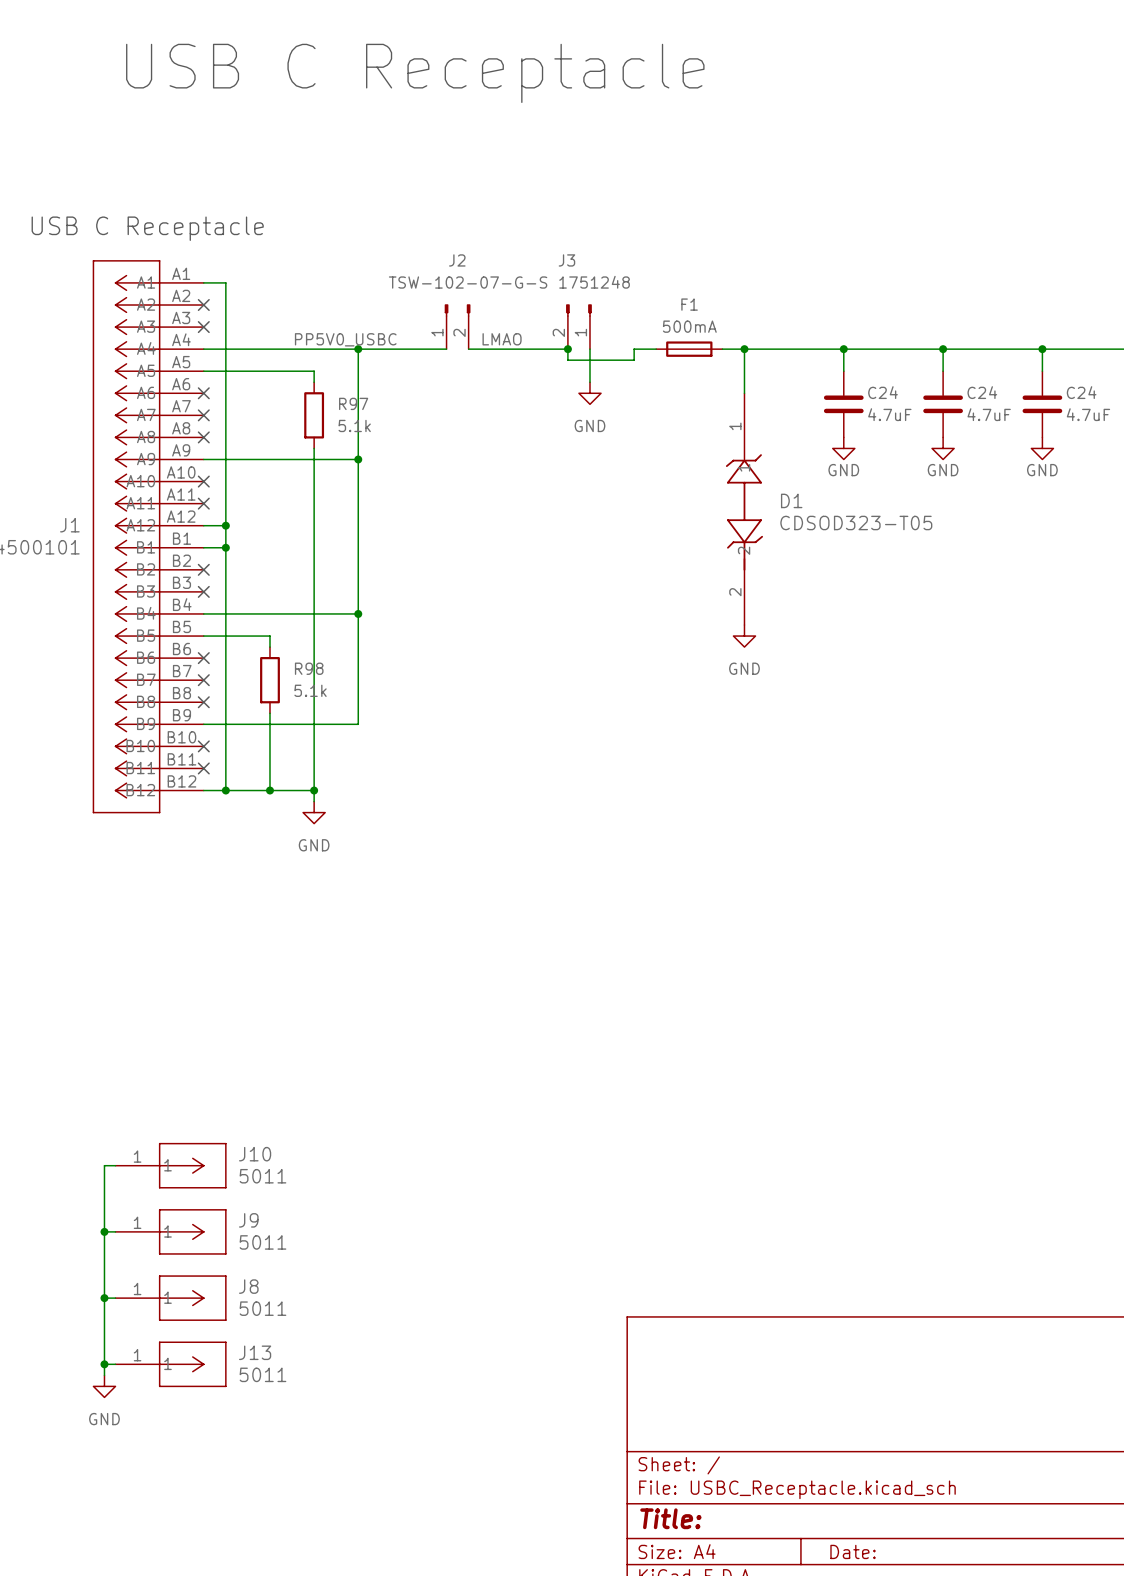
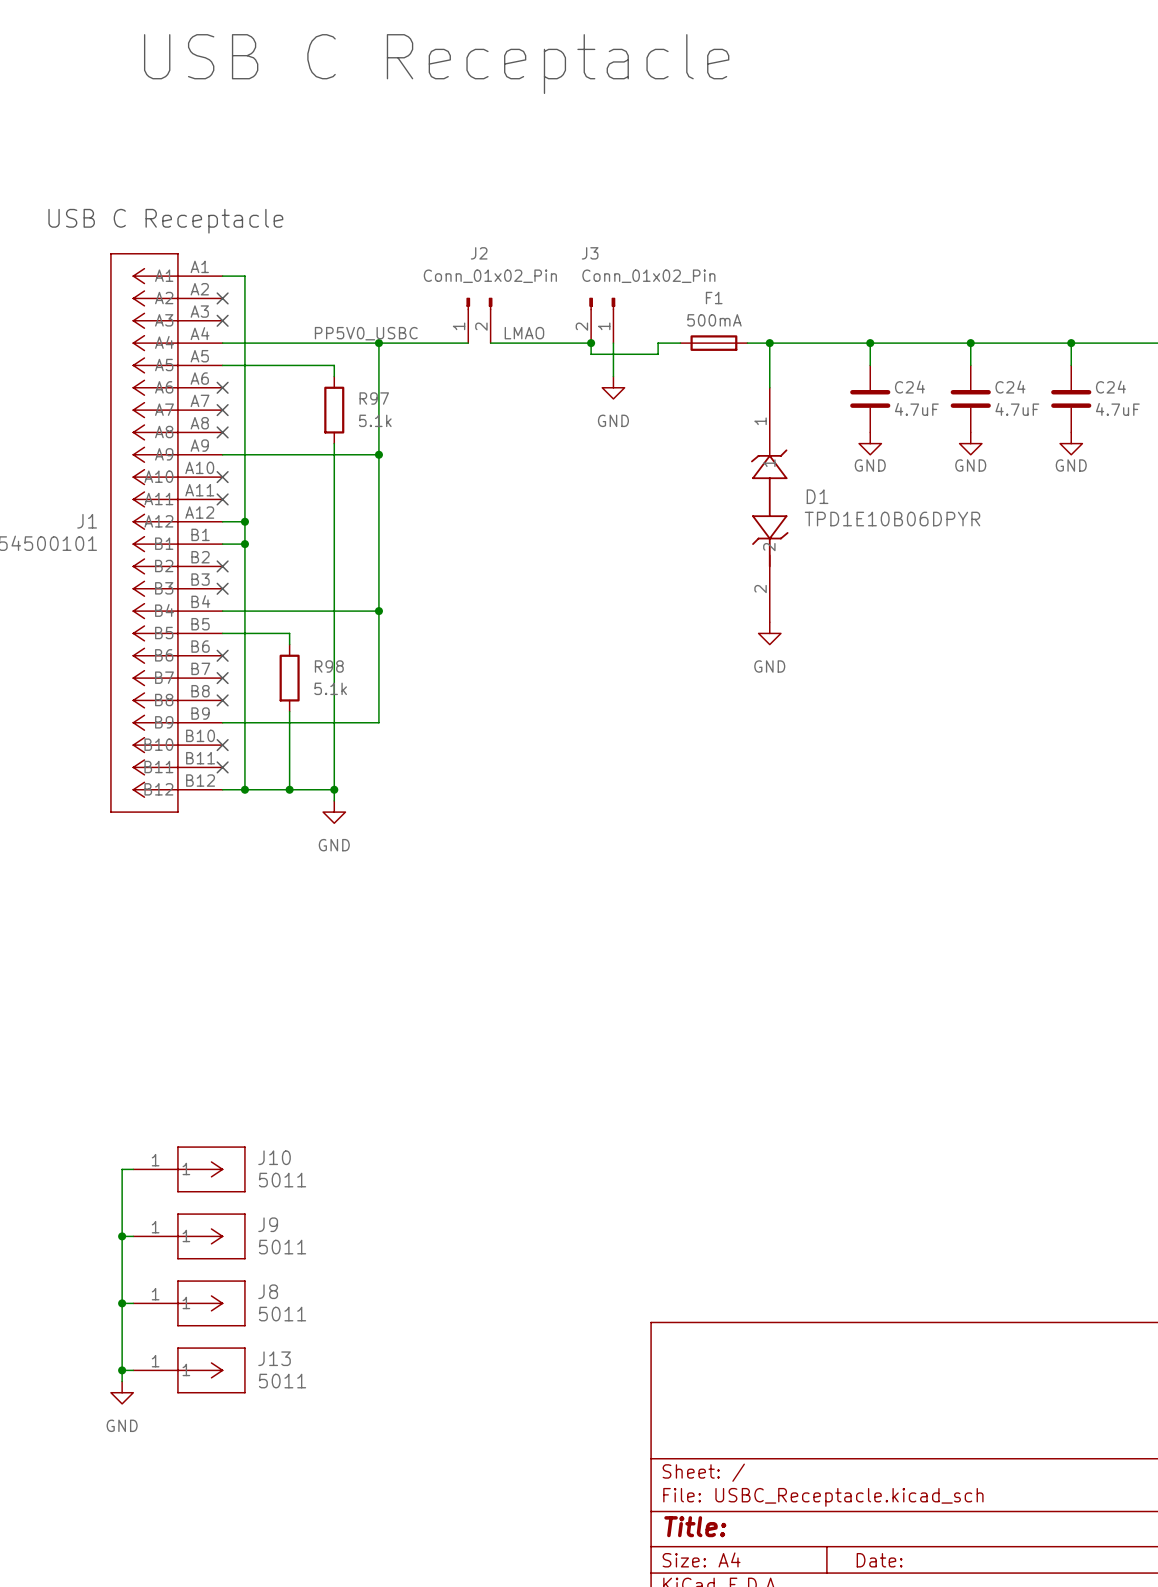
J2 value: TSW-102-07-G-S (468, 282) -> Conn_01x02_Pin (490, 276)
J3 value: 1751248 (594, 282) -> Conn_01x02_Pin (648, 276)
D1 value: CDSOD323-T05 (856, 522) -> TPD1E10B06DPYR (892, 519)

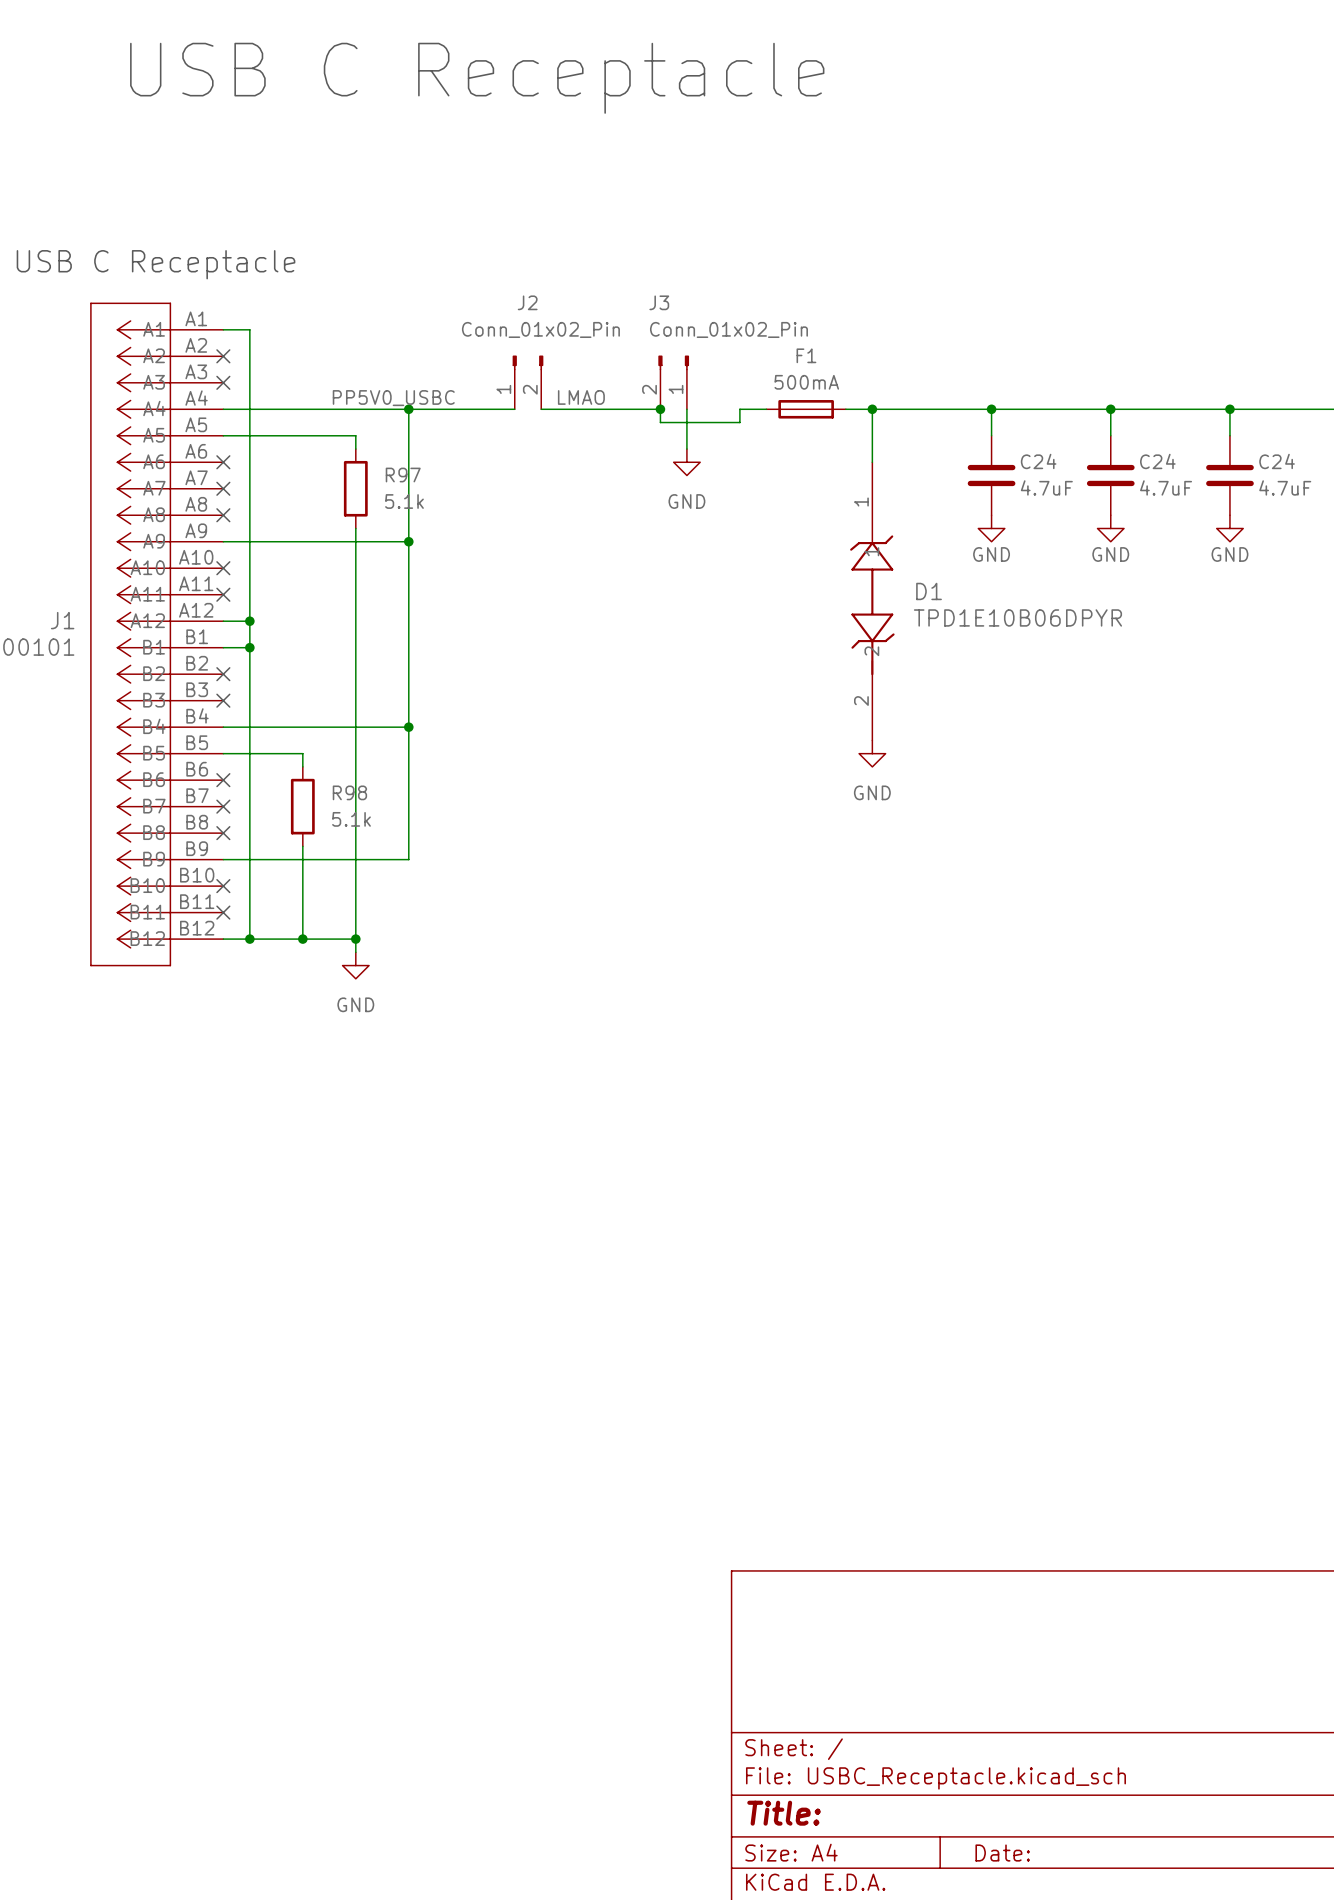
wire: (133, 1169) (122, 1169) (122, 1381) -> none
J10: 5011 (189, 1169) -> none
wire: (122, 1236) (133, 1236) -> none
junction: (122, 1236) -> none
J9: 5011 (189, 1236) -> none
wire: (122, 1303) (133, 1303) -> none
junction: (122, 1303) -> none
J8: 5011 (189, 1303) -> none
wire: (122, 1370) (133, 1370) -> none
junction: (122, 1370) -> none
J13: 5011 (189, 1370) -> none
power symbol: GND (122, 1392) -> none

